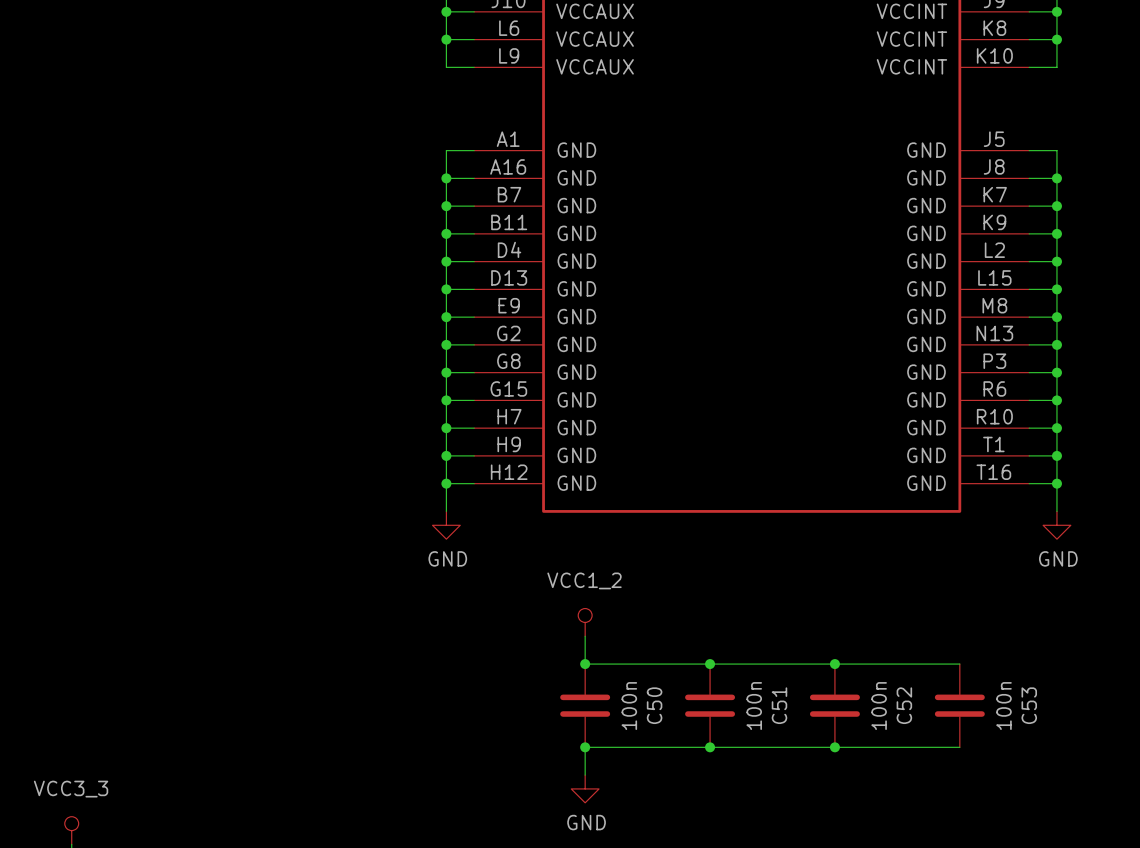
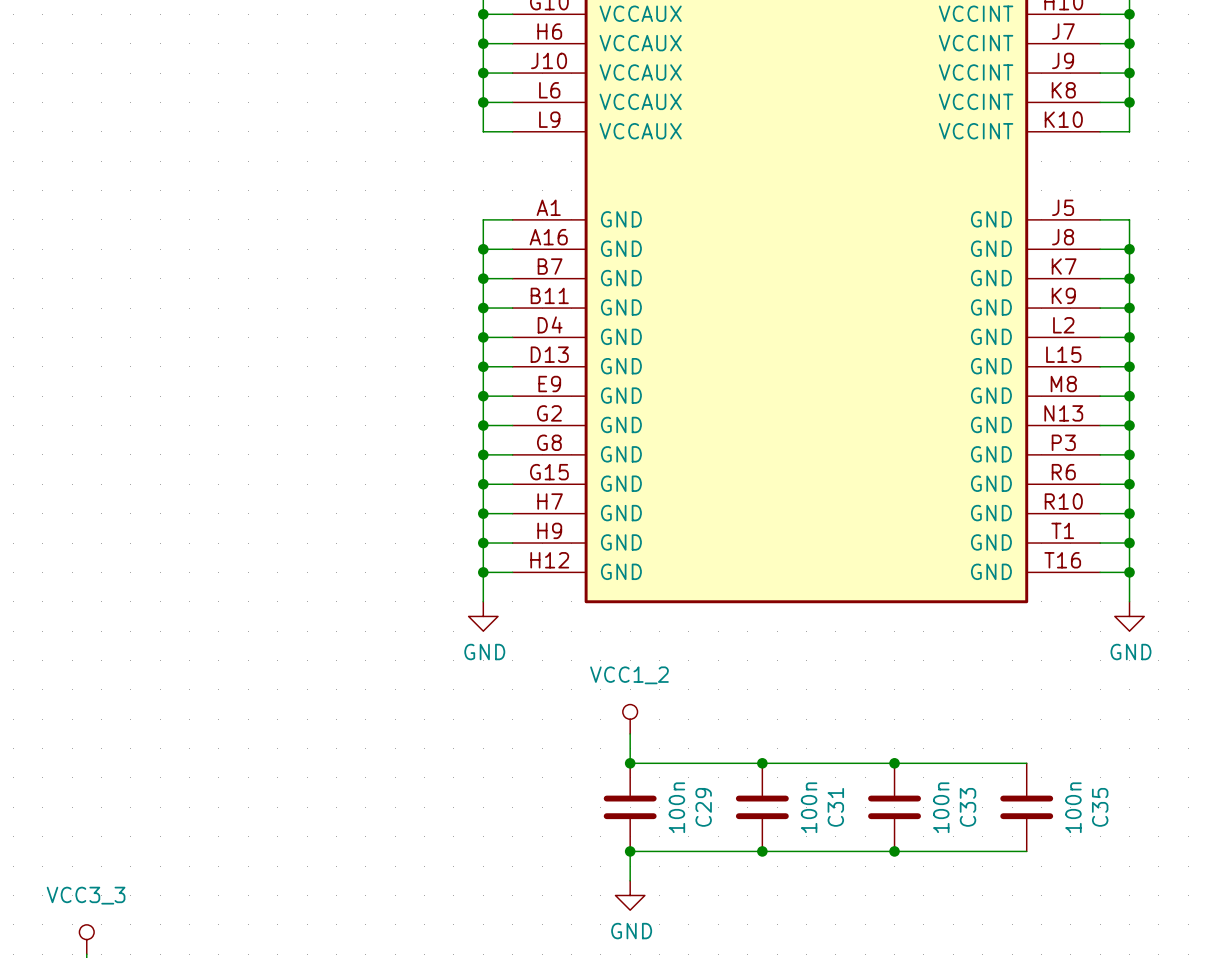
C50 name: C50 (654, 705) -> C29 (703, 807)
C51 name: C51 (779, 705) -> C31 (835, 807)
C52 name: C52 (904, 705) -> C33 (968, 807)
C53 name: C53 (1029, 705) -> C35 (1100, 807)

